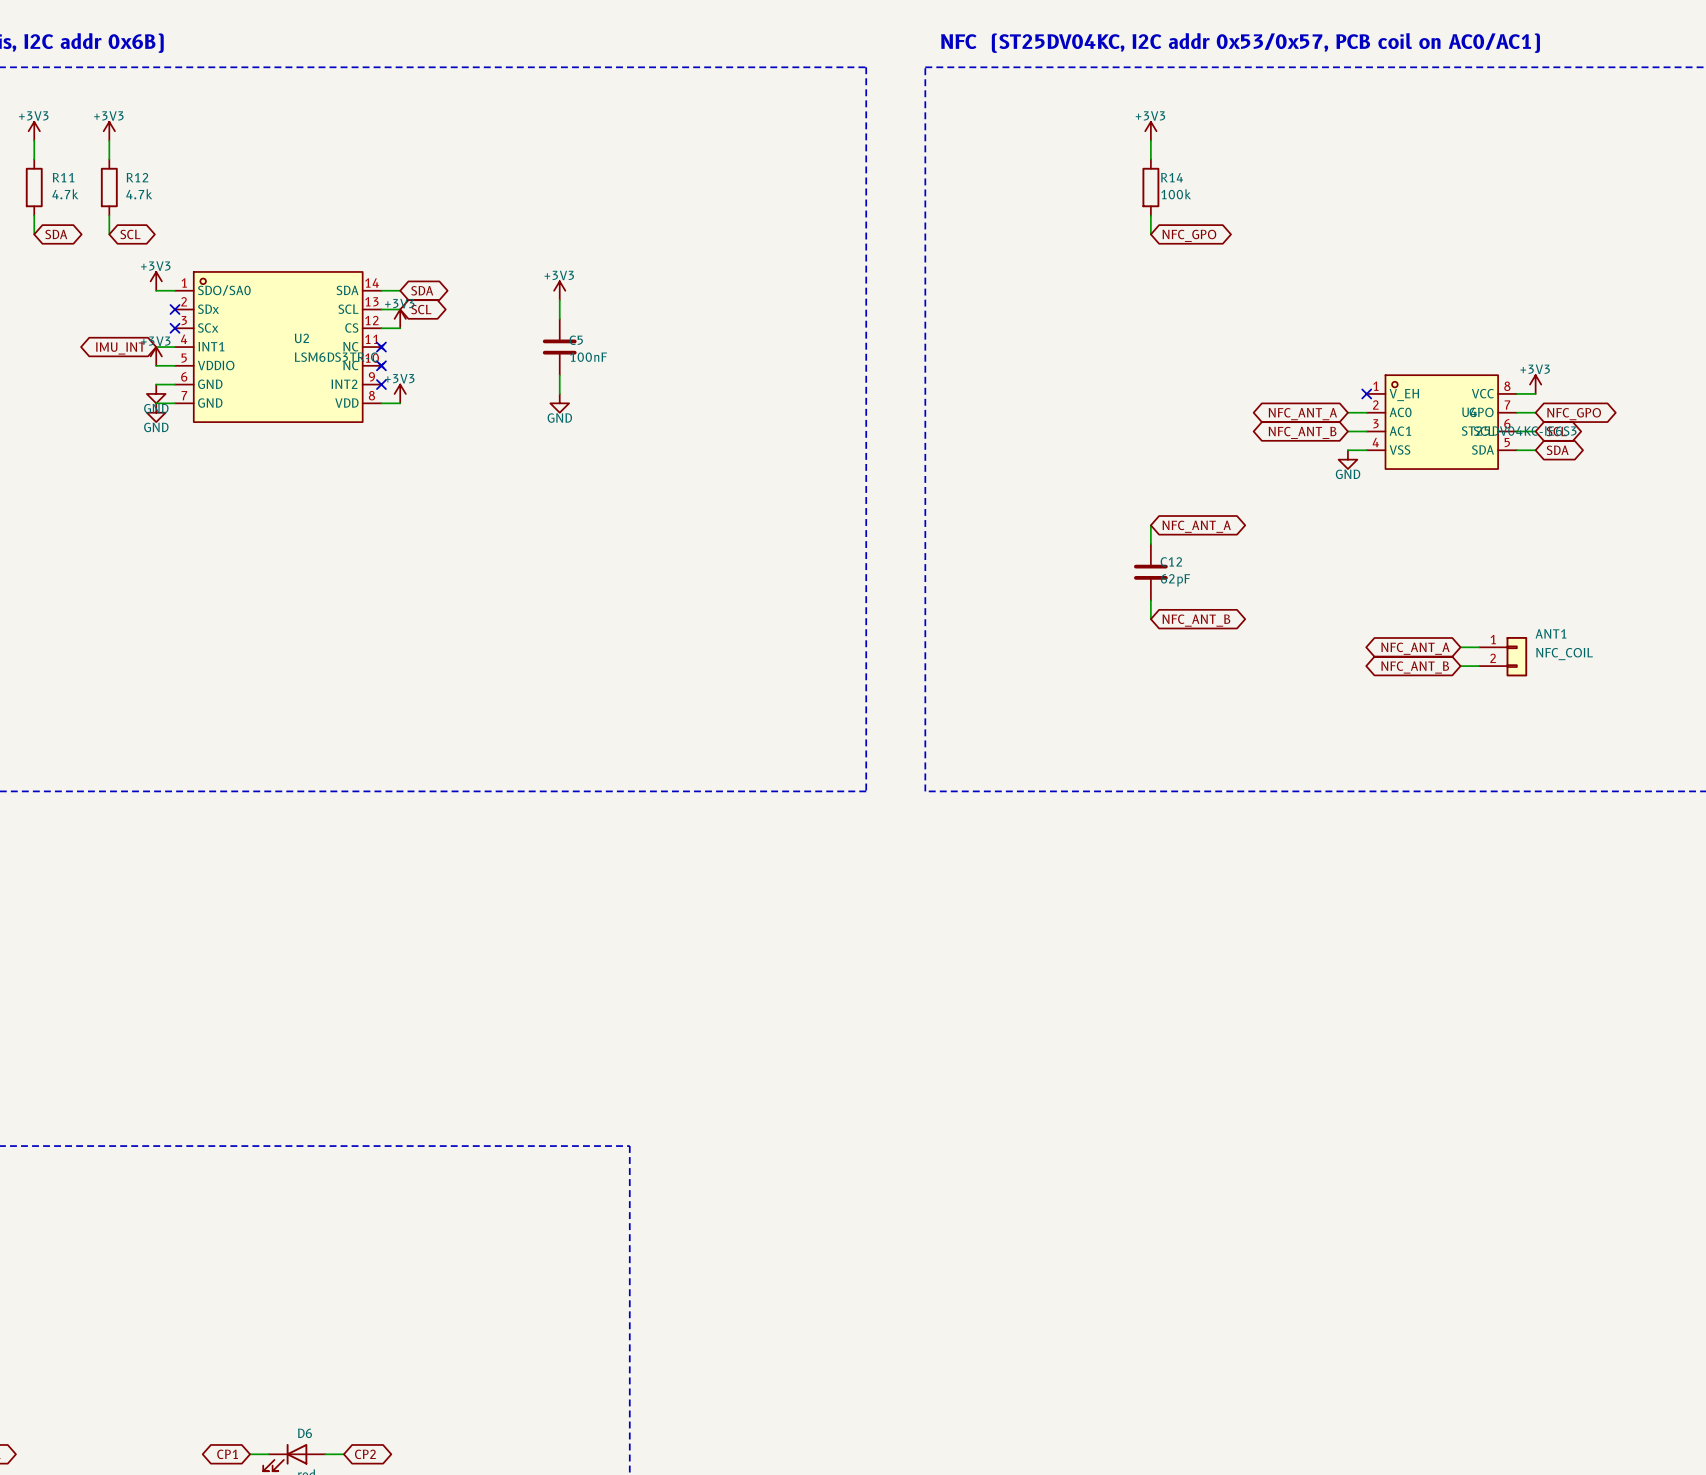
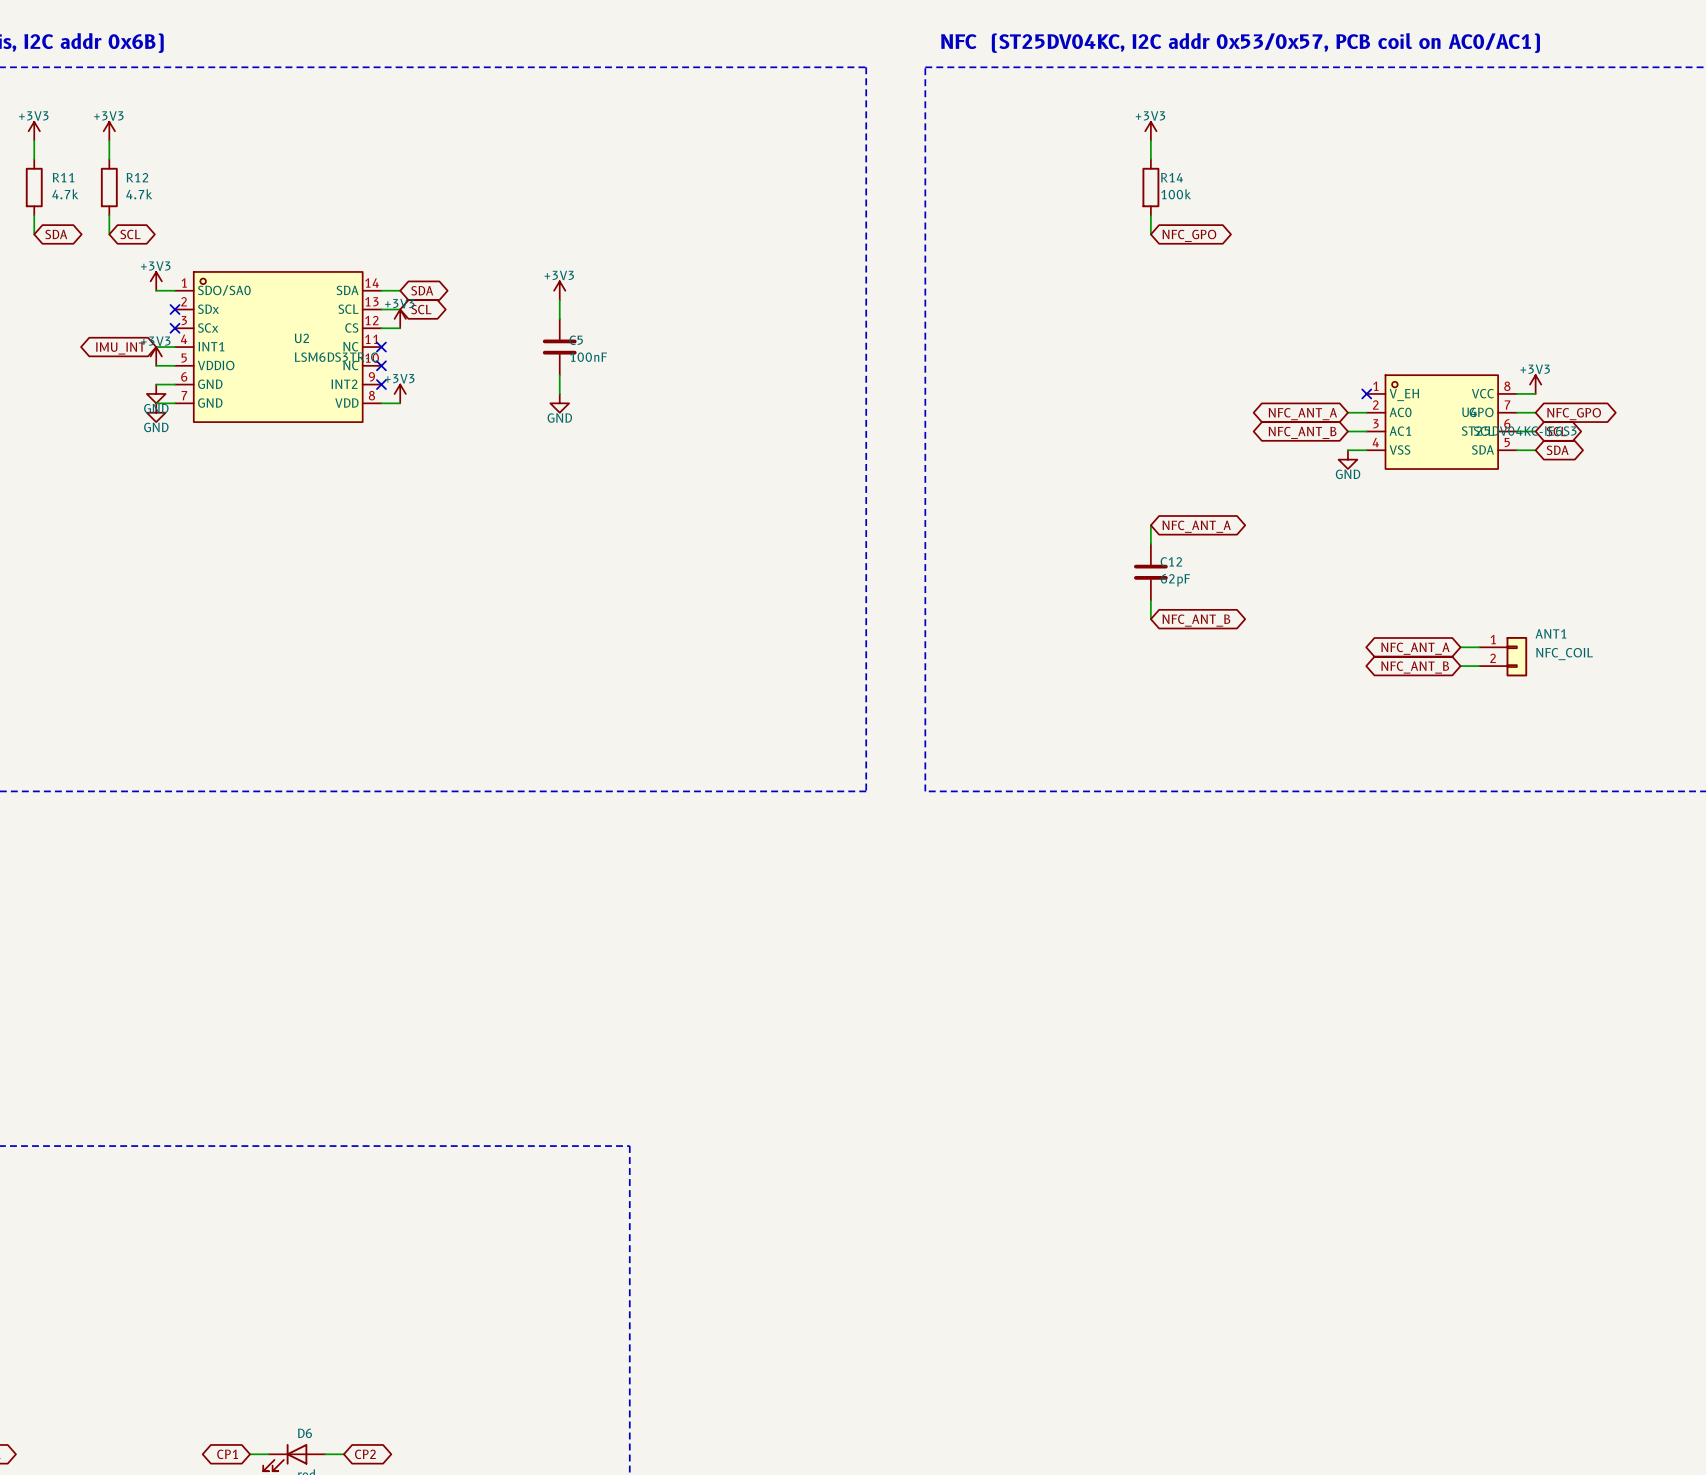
U2 symbol: [175, 271, 384, 423] -> [175, 271, 382, 423]

